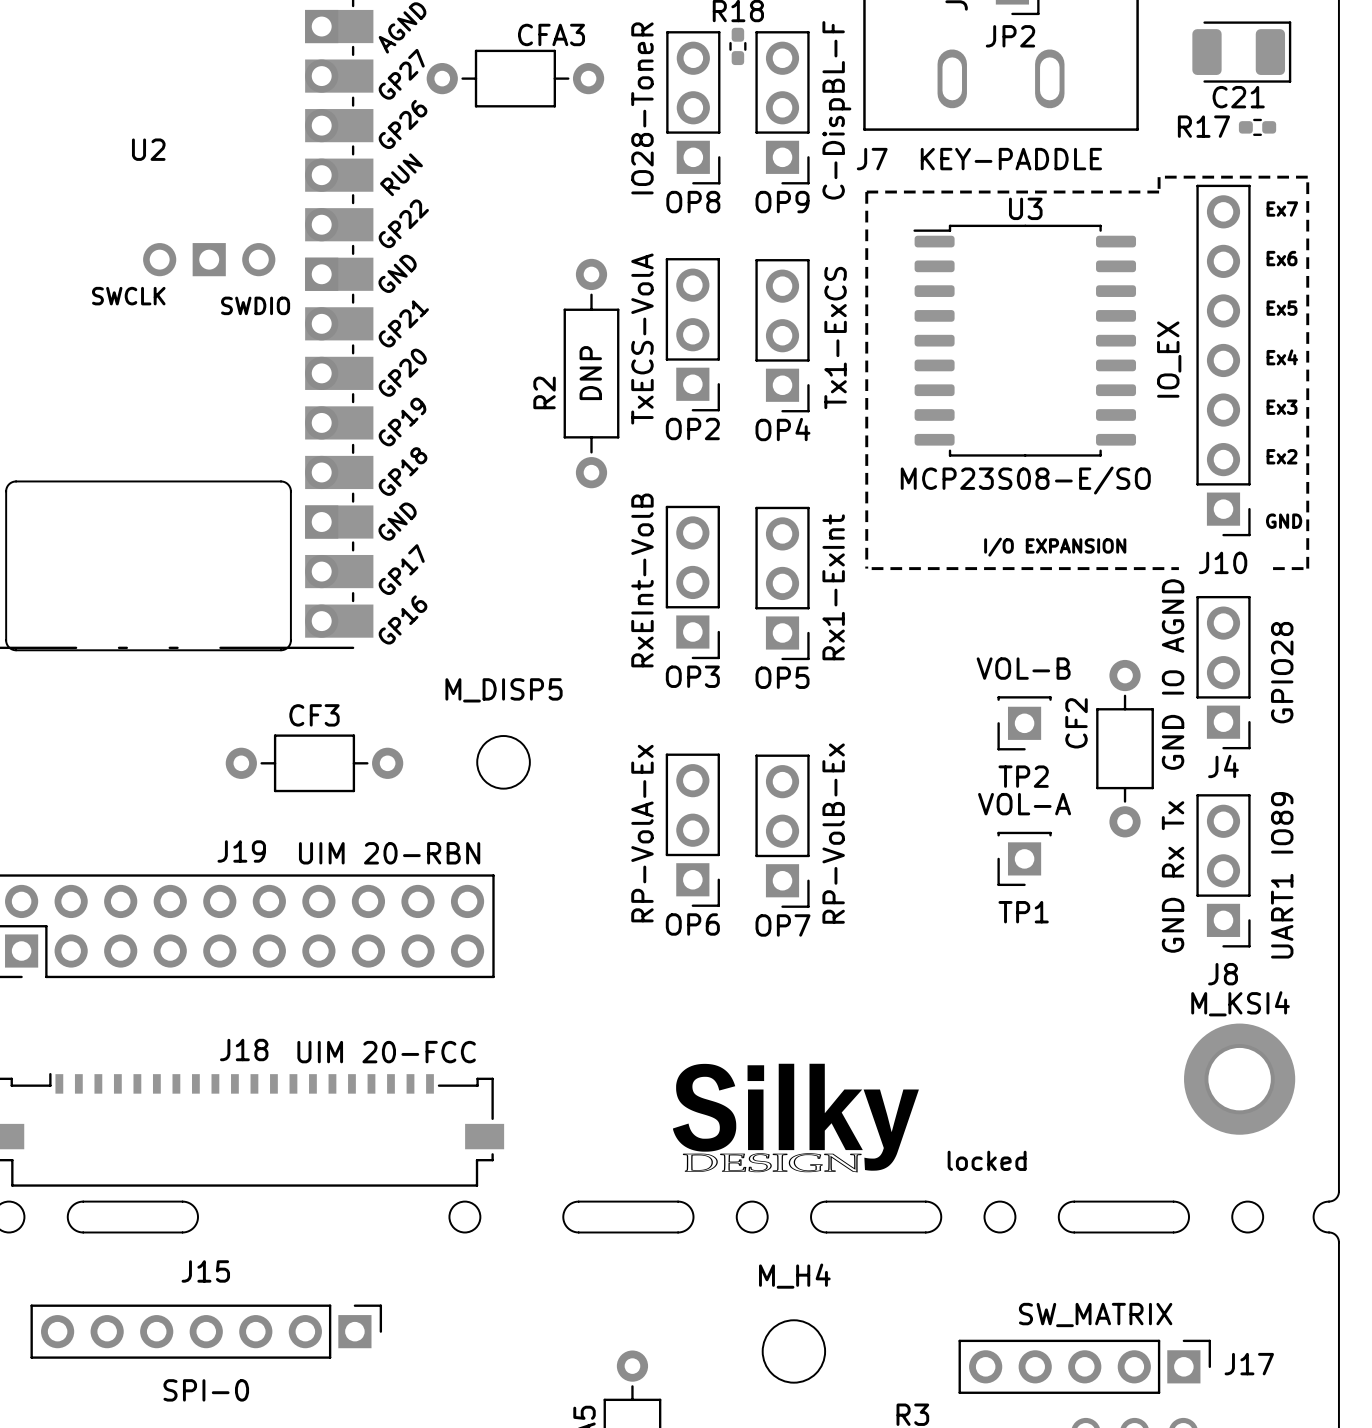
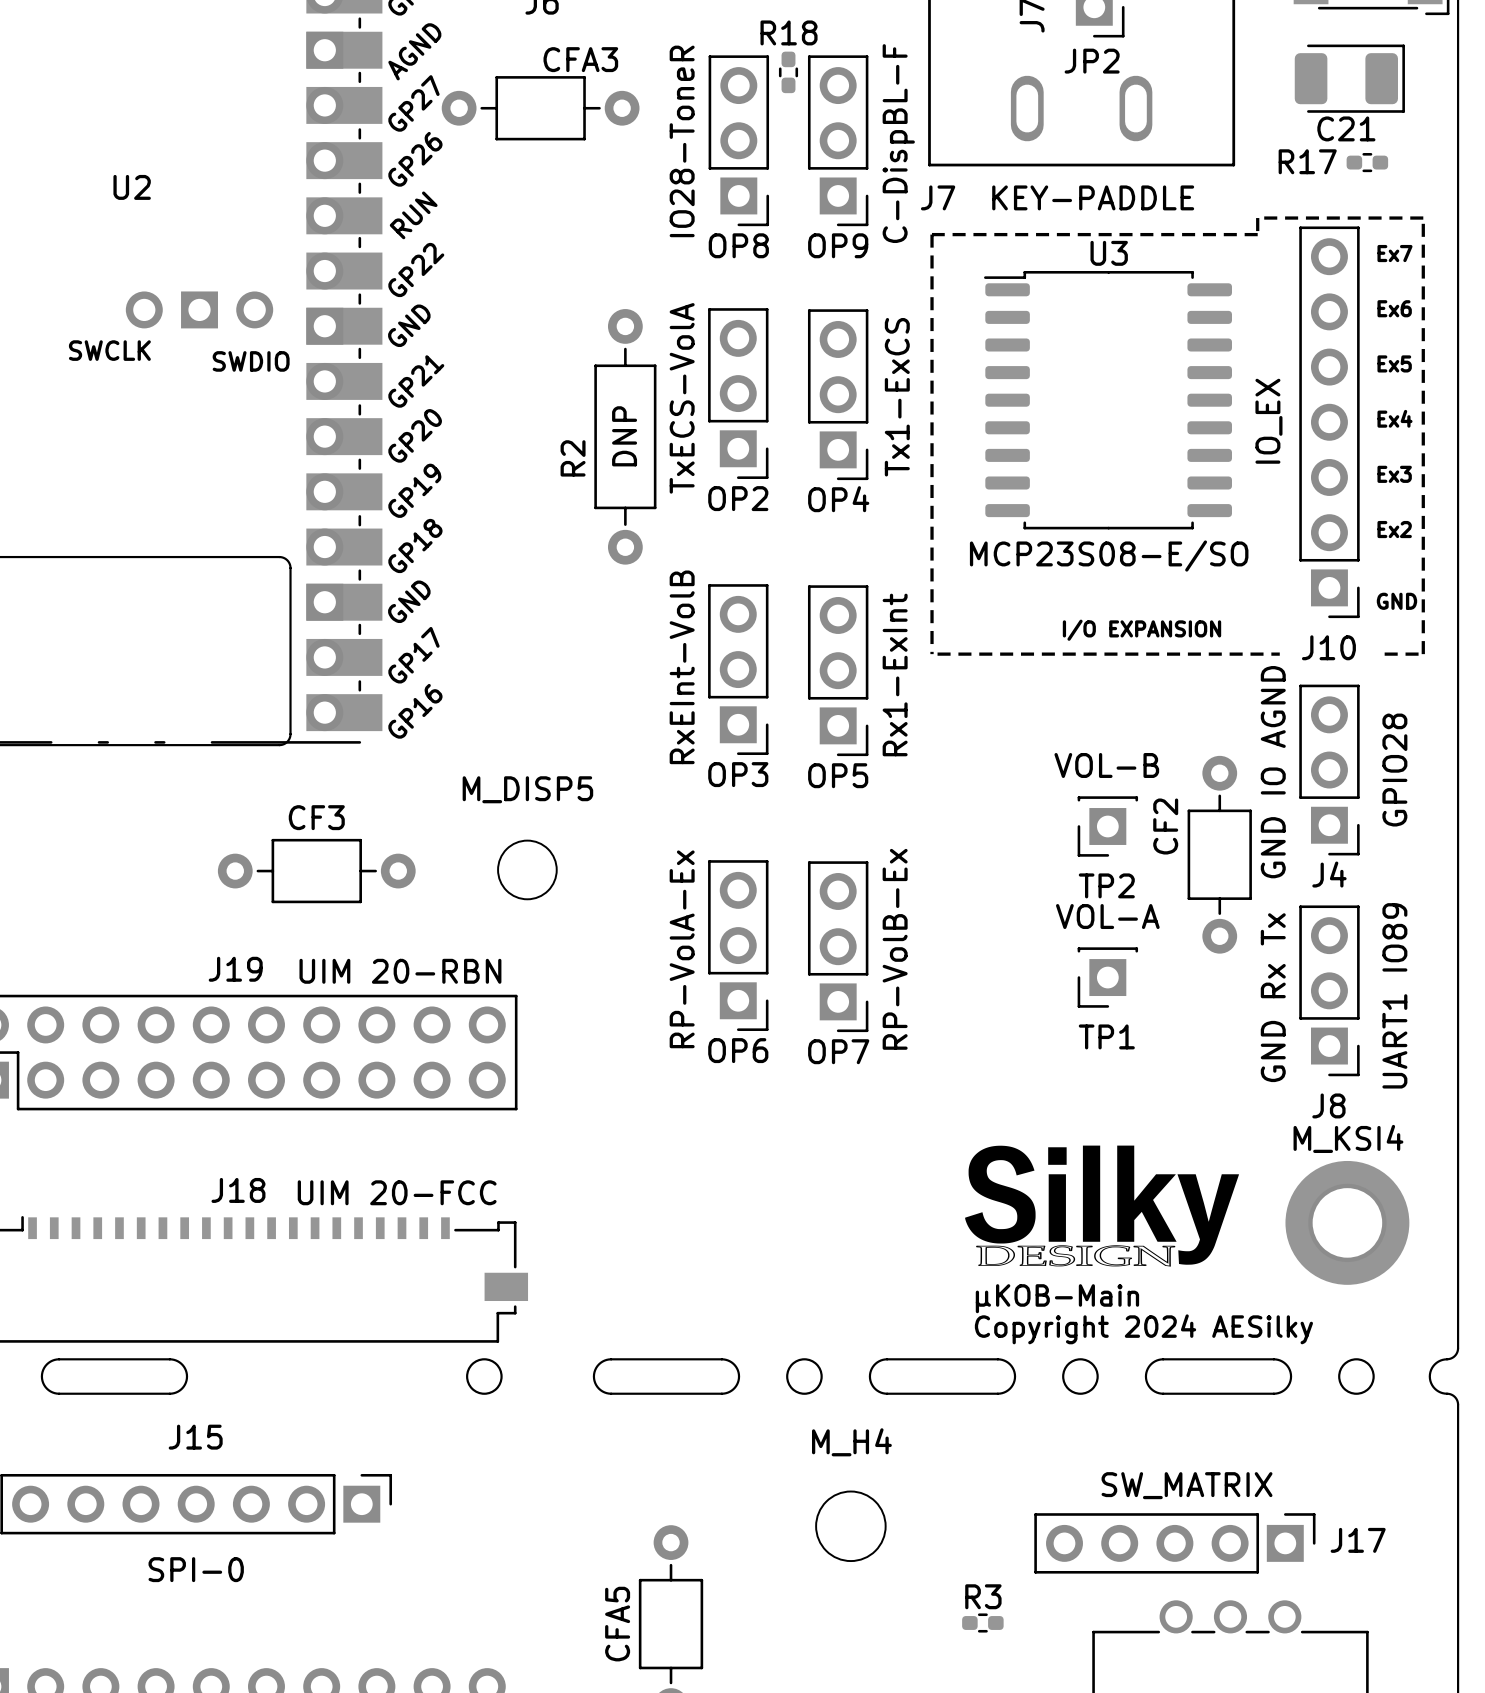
drawing position: (795, 1118) -> (1102, 1206)
text: none -> μKOB-Main (1057, 1298)
text: locked (987, 1160) -> none
text: none -> Copyright 2024 AESilky (1143, 1329)

